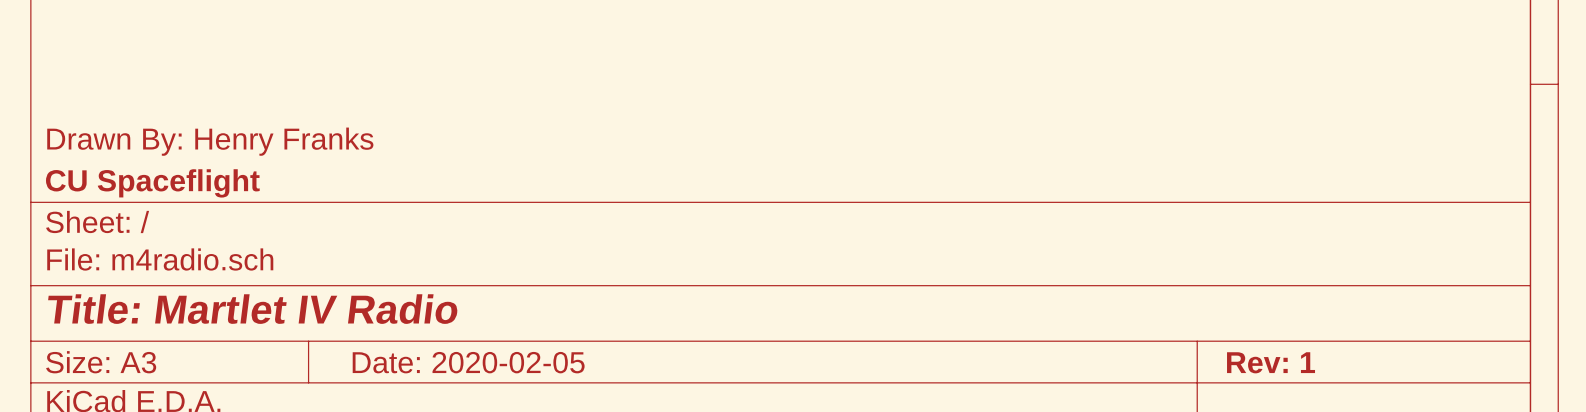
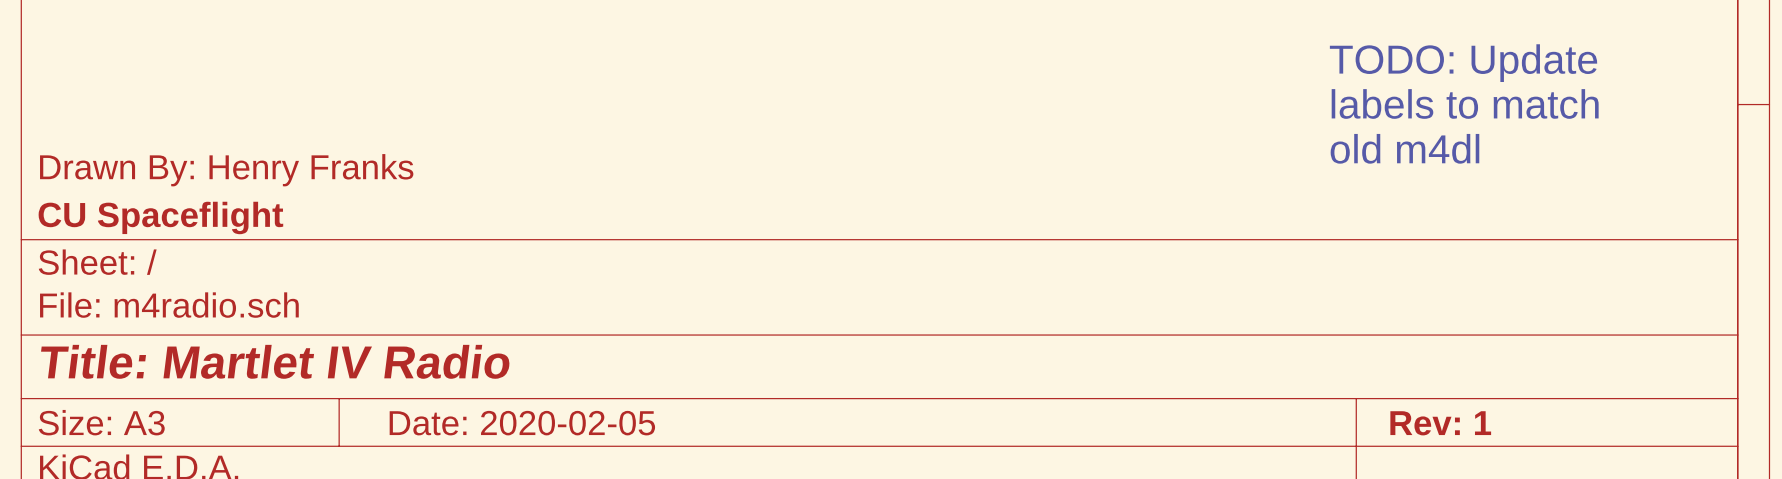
text: none -> TODO: Update (1463, 63)
text: none -> labels to match (1465, 103)
text: none -> old m4dl (1404, 148)

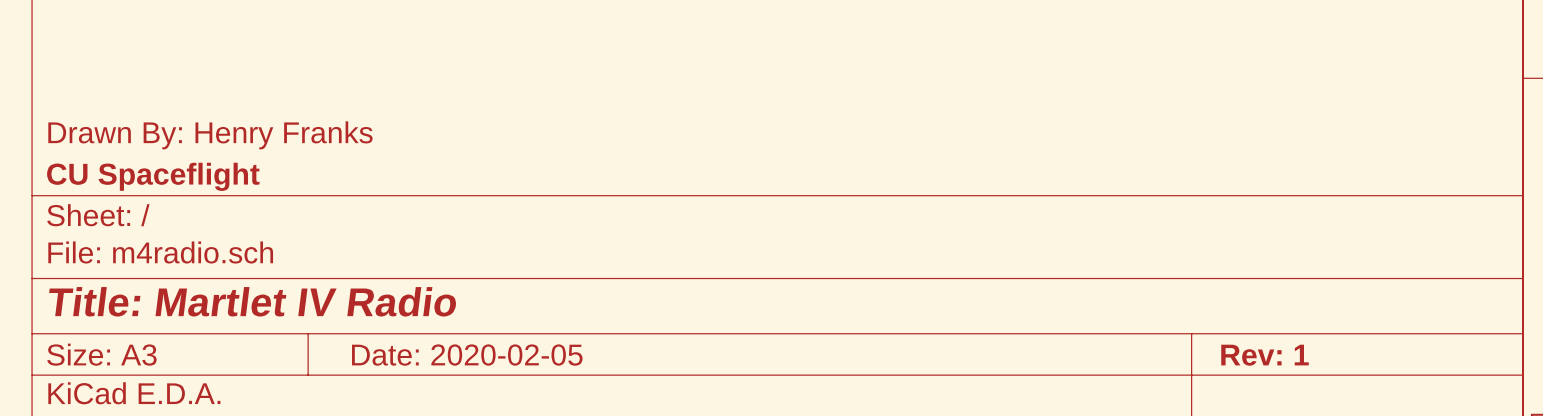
text: TODO: Update (1463, 63) -> none
text: labels to match (1465, 103) -> none
text: old m4dl (1404, 148) -> none

